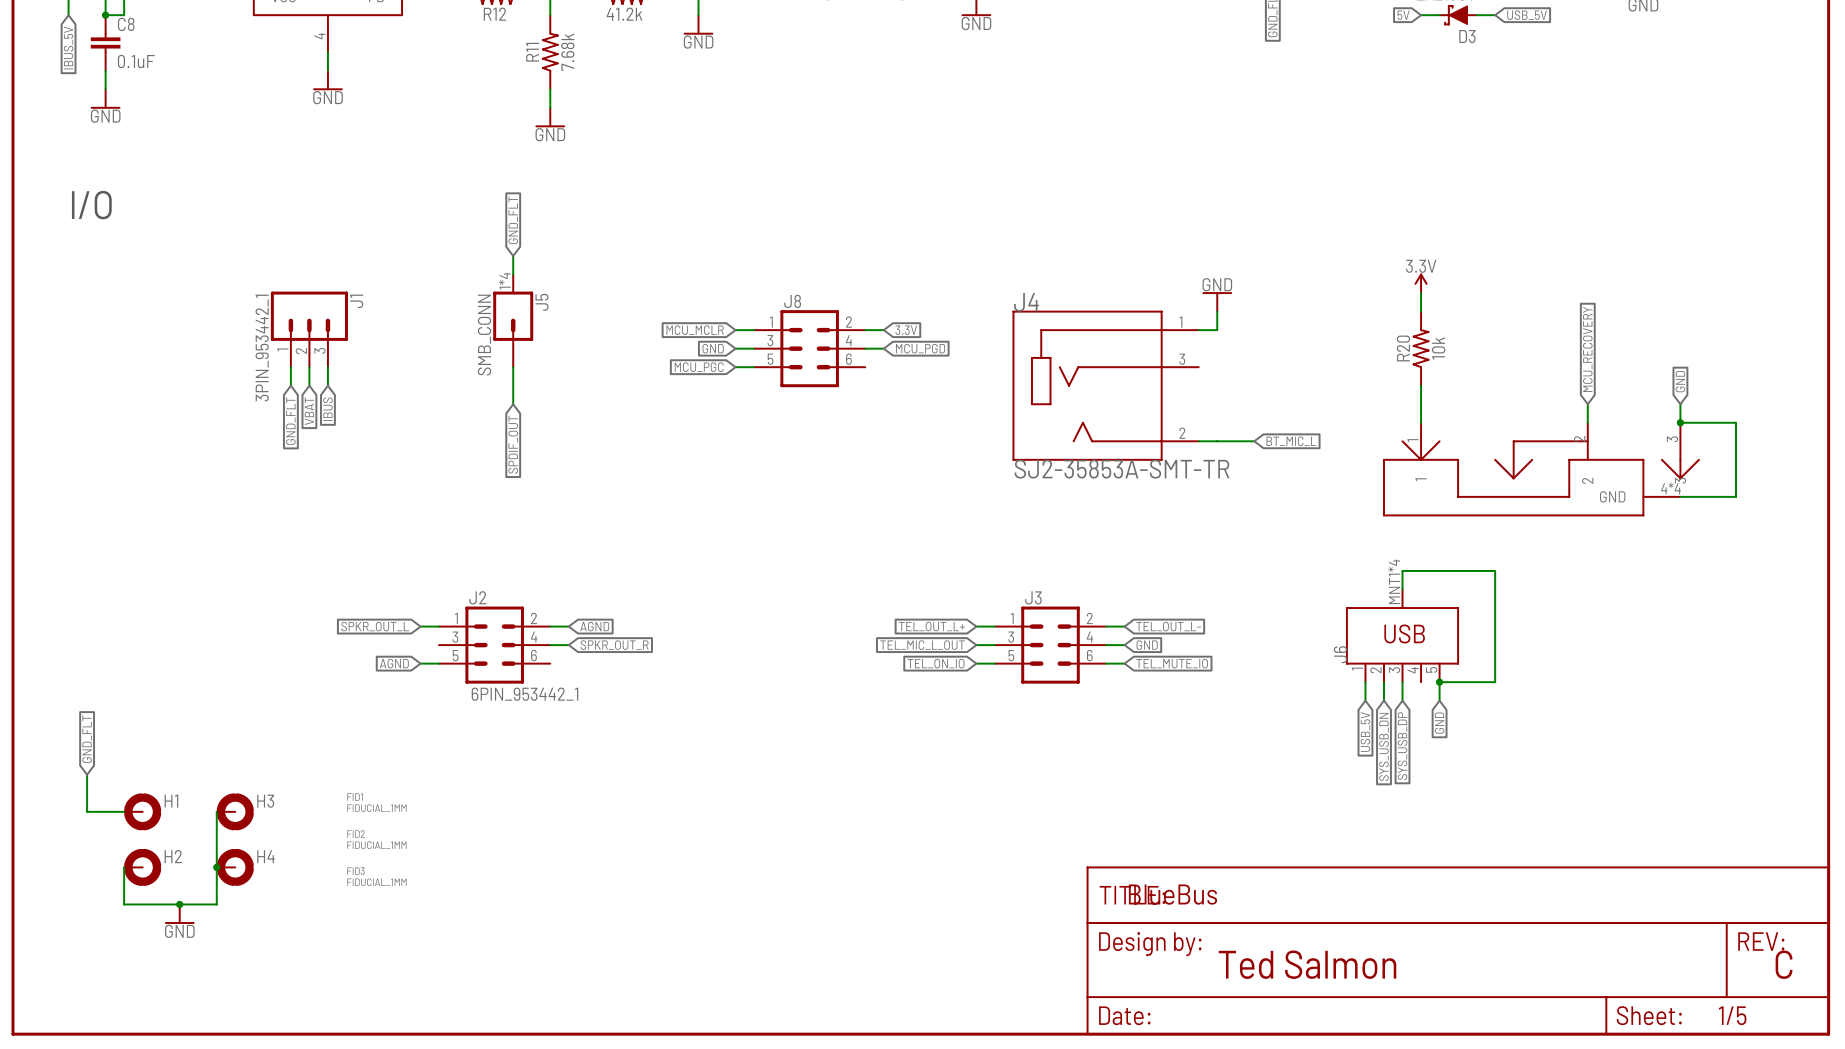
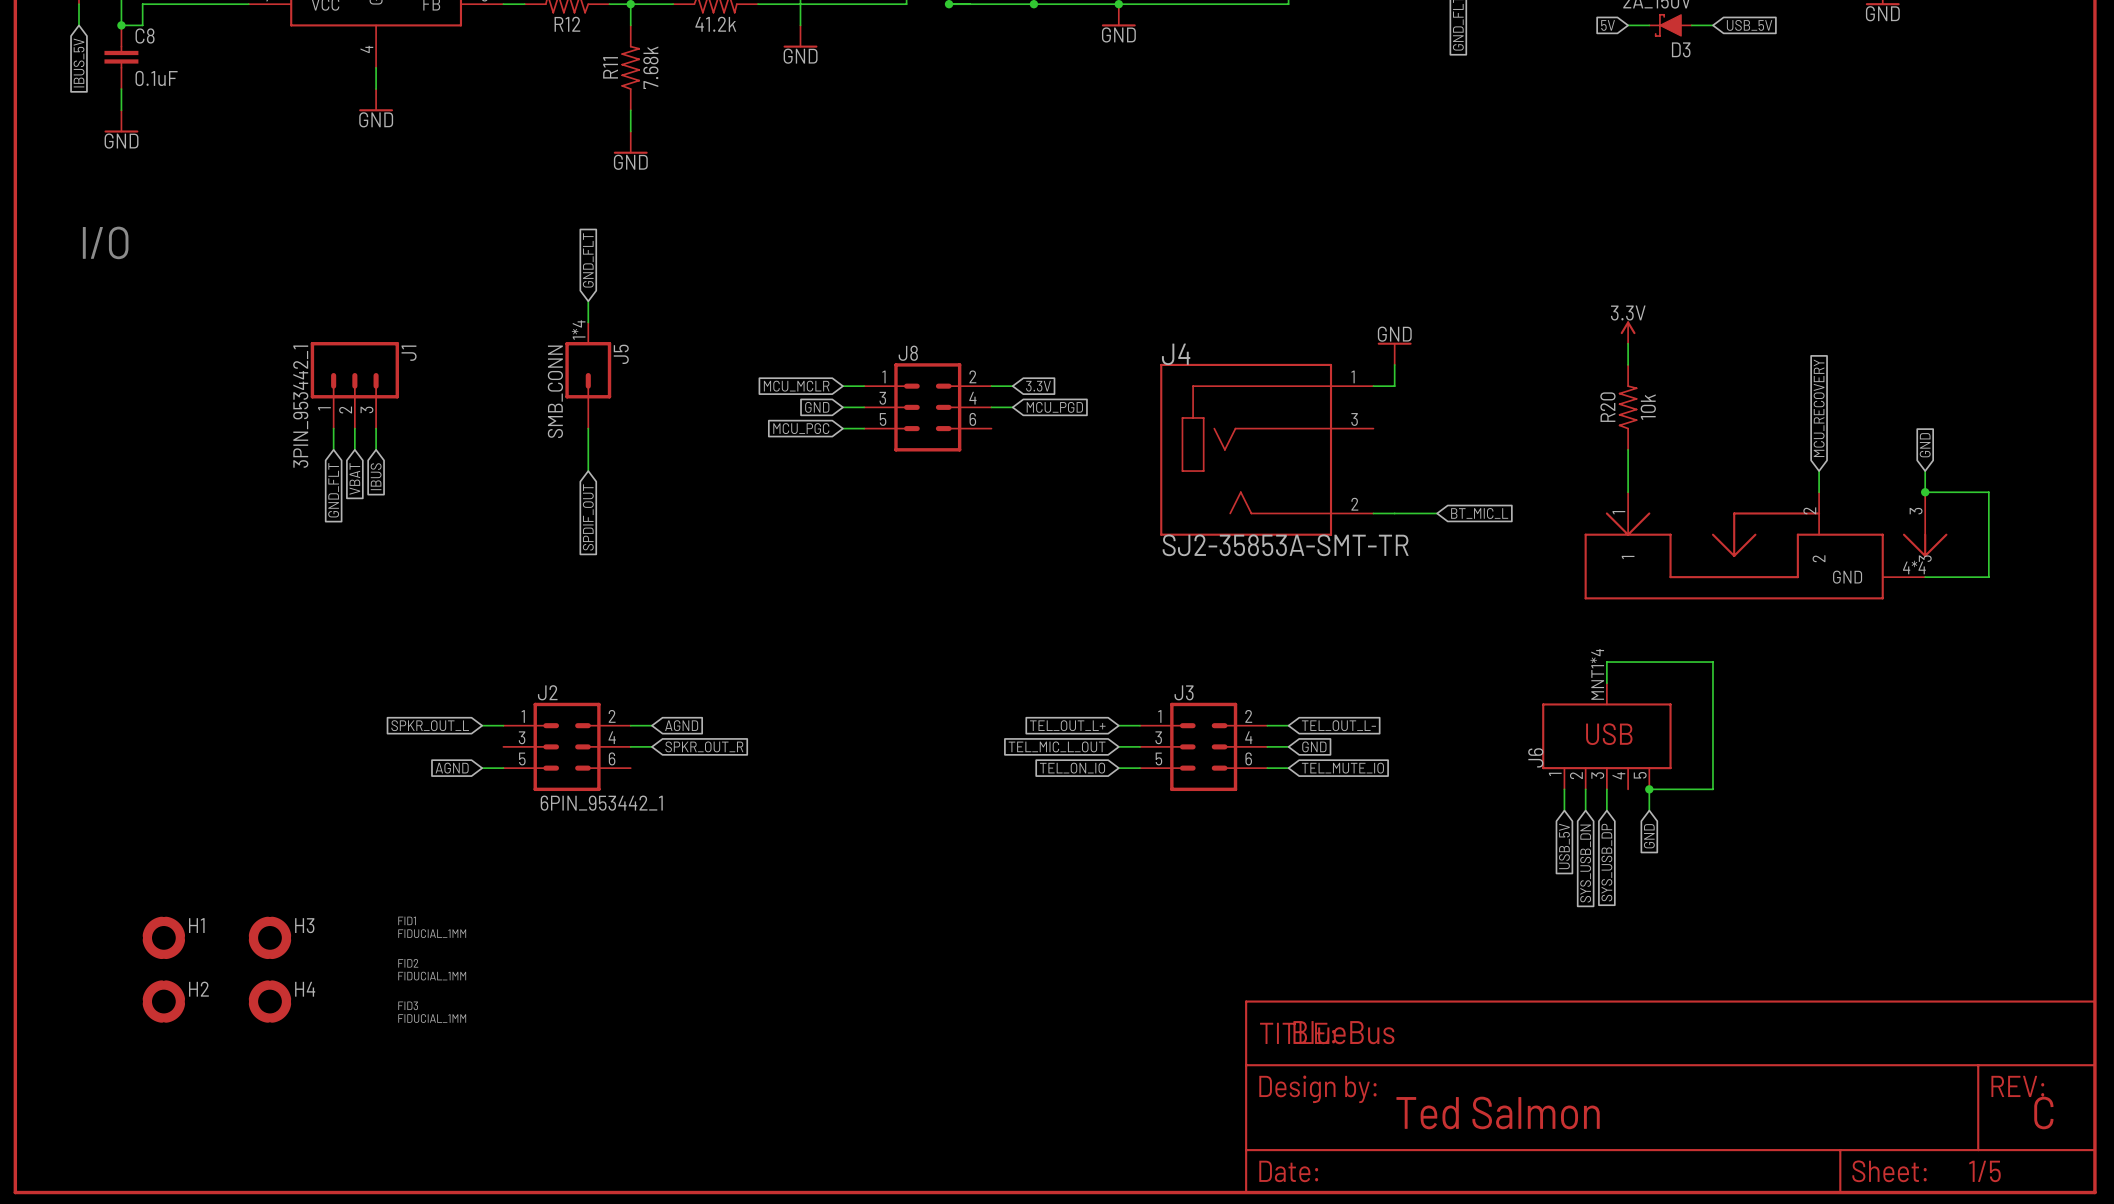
global label: GND_FLT (87, 739) -> none
wire: (87, 774) (87, 811) (124, 811) -> none
H1 symbol: [124, 793, 162, 831] -> [142, 916, 186, 960]
H3 symbol: [216, 793, 254, 831] -> [248, 916, 292, 960]
wire: (216, 811) (216, 904) (124, 904) (124, 867) -> none
H2 symbol: [124, 848, 162, 886] -> [142, 980, 186, 1023]
H4 symbol: [216, 848, 254, 886] -> [248, 980, 292, 1023]
junction: (216, 867) -> none
junction: (179, 904) -> none
power symbol: GND (179, 914) -> none

